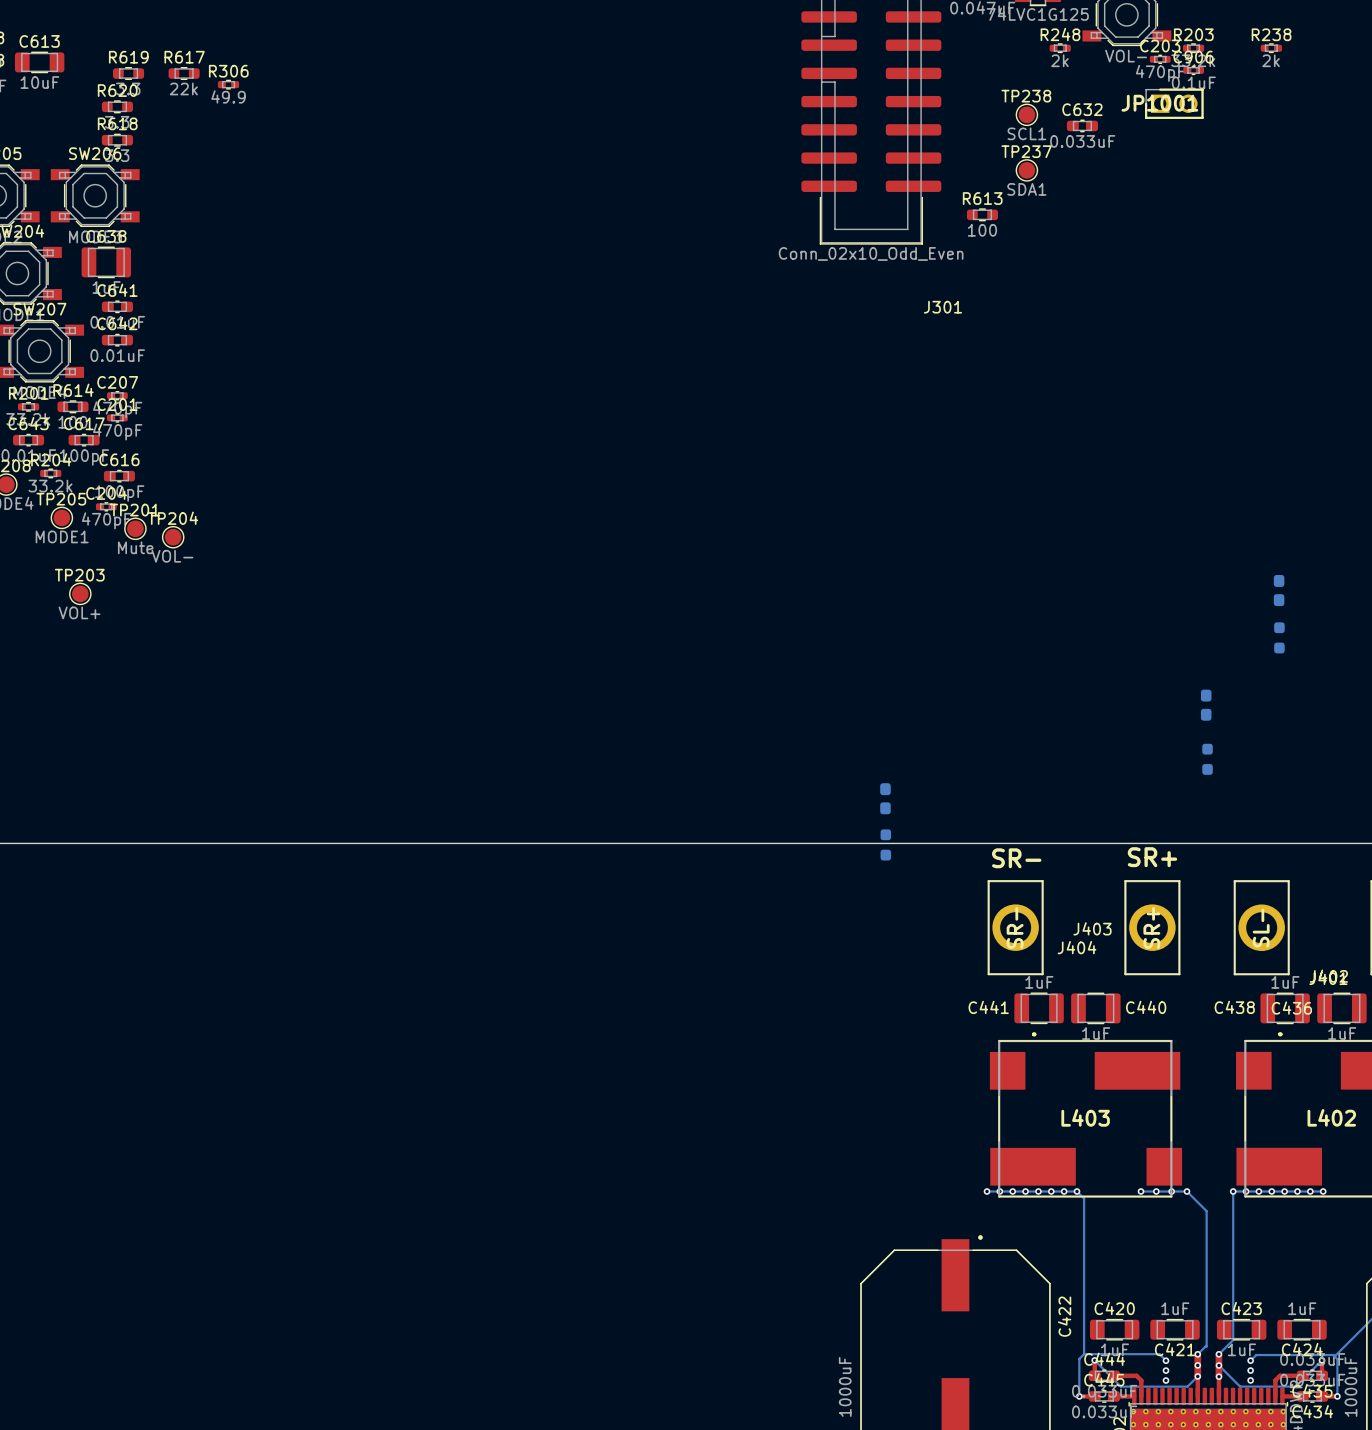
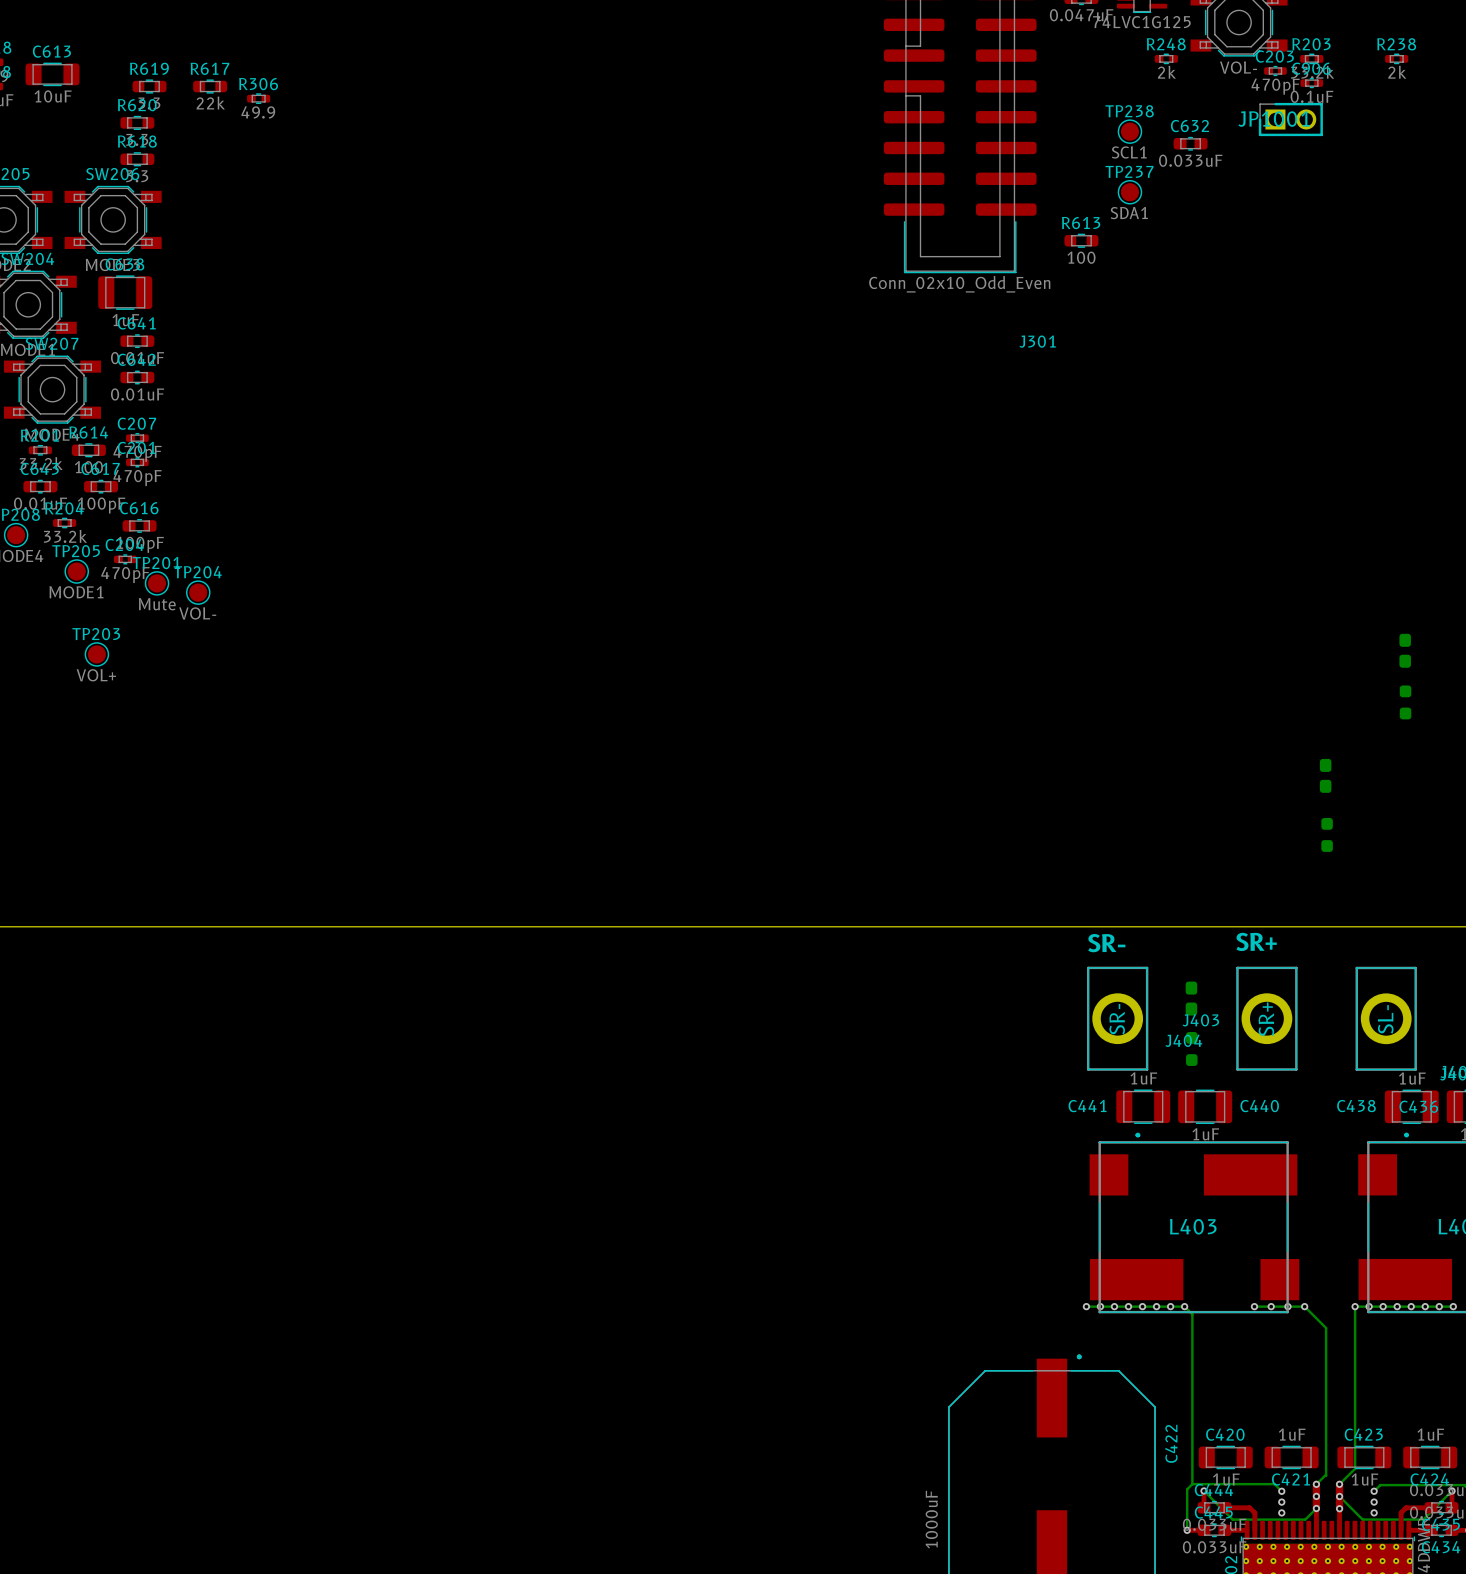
part position: (885, 798) -> (1191, 998)
part position: (885, 844) -> (1191, 1048)

